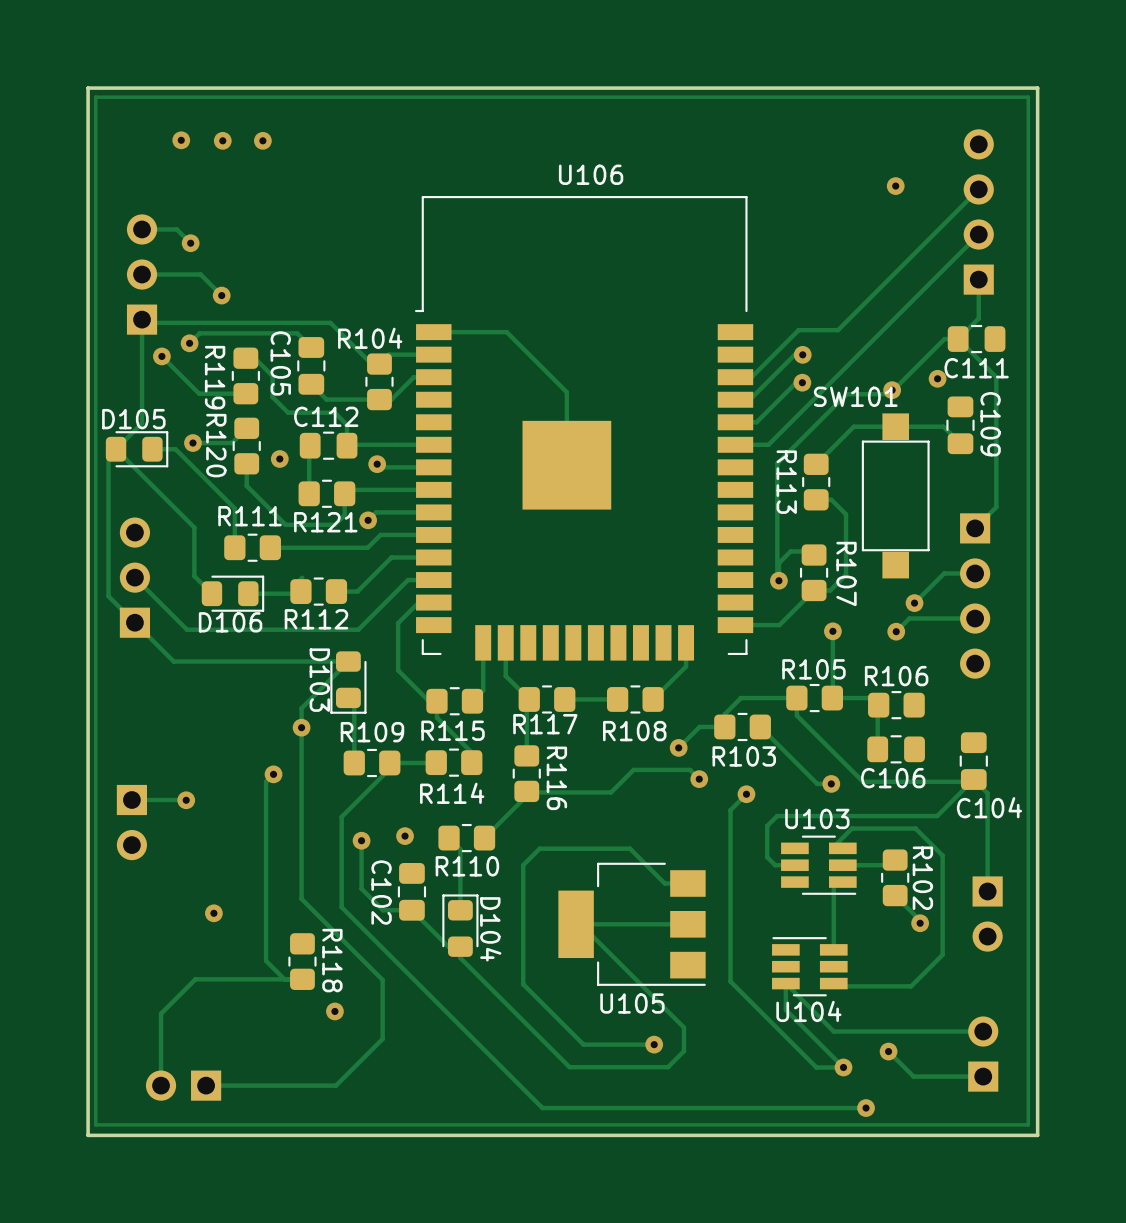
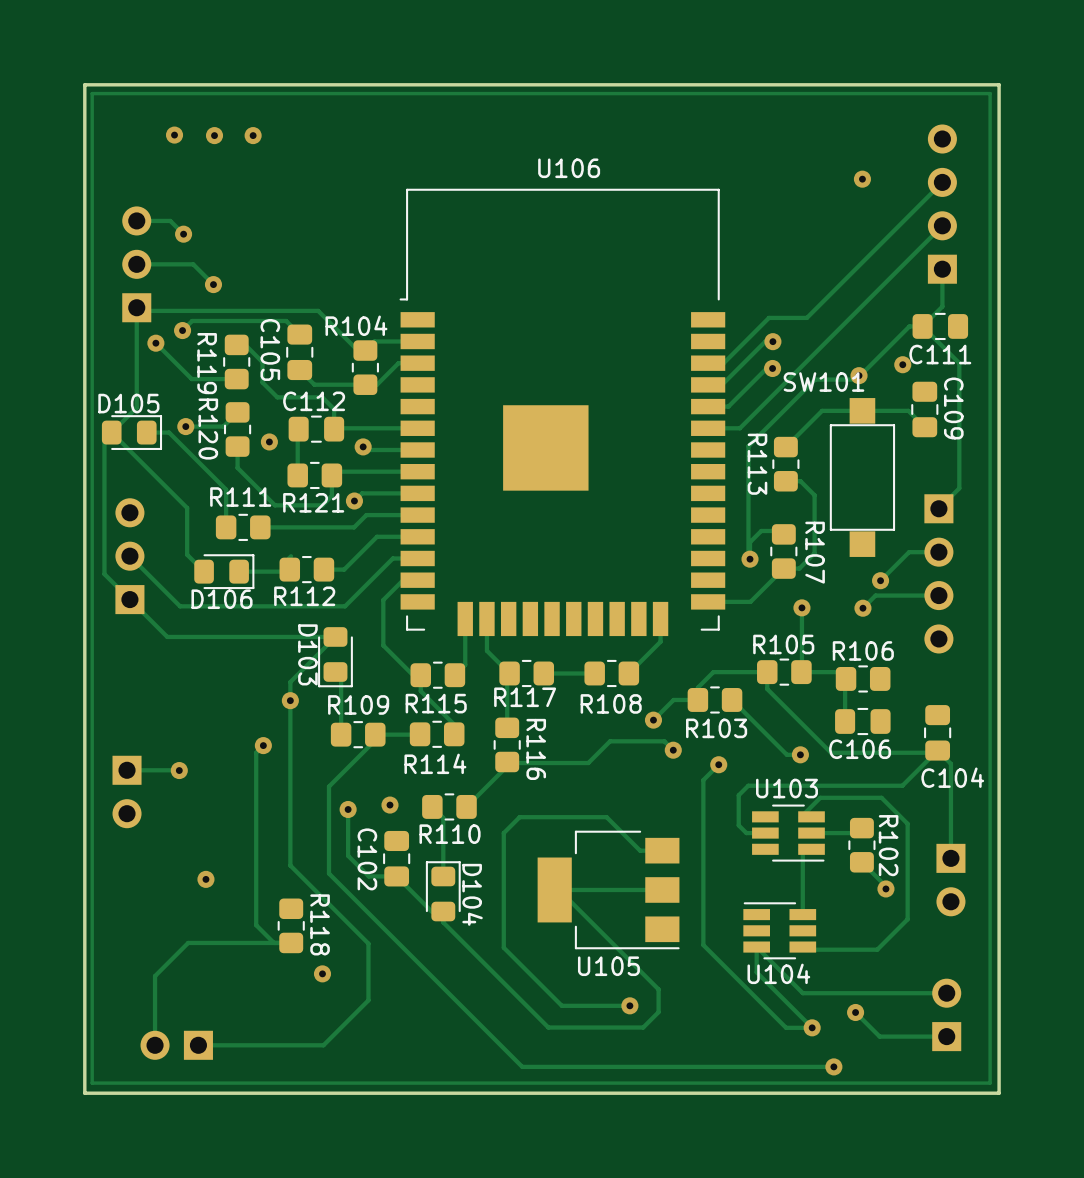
track: (433, 332) (506, 332) (566, 392) (566, 465) -> none

